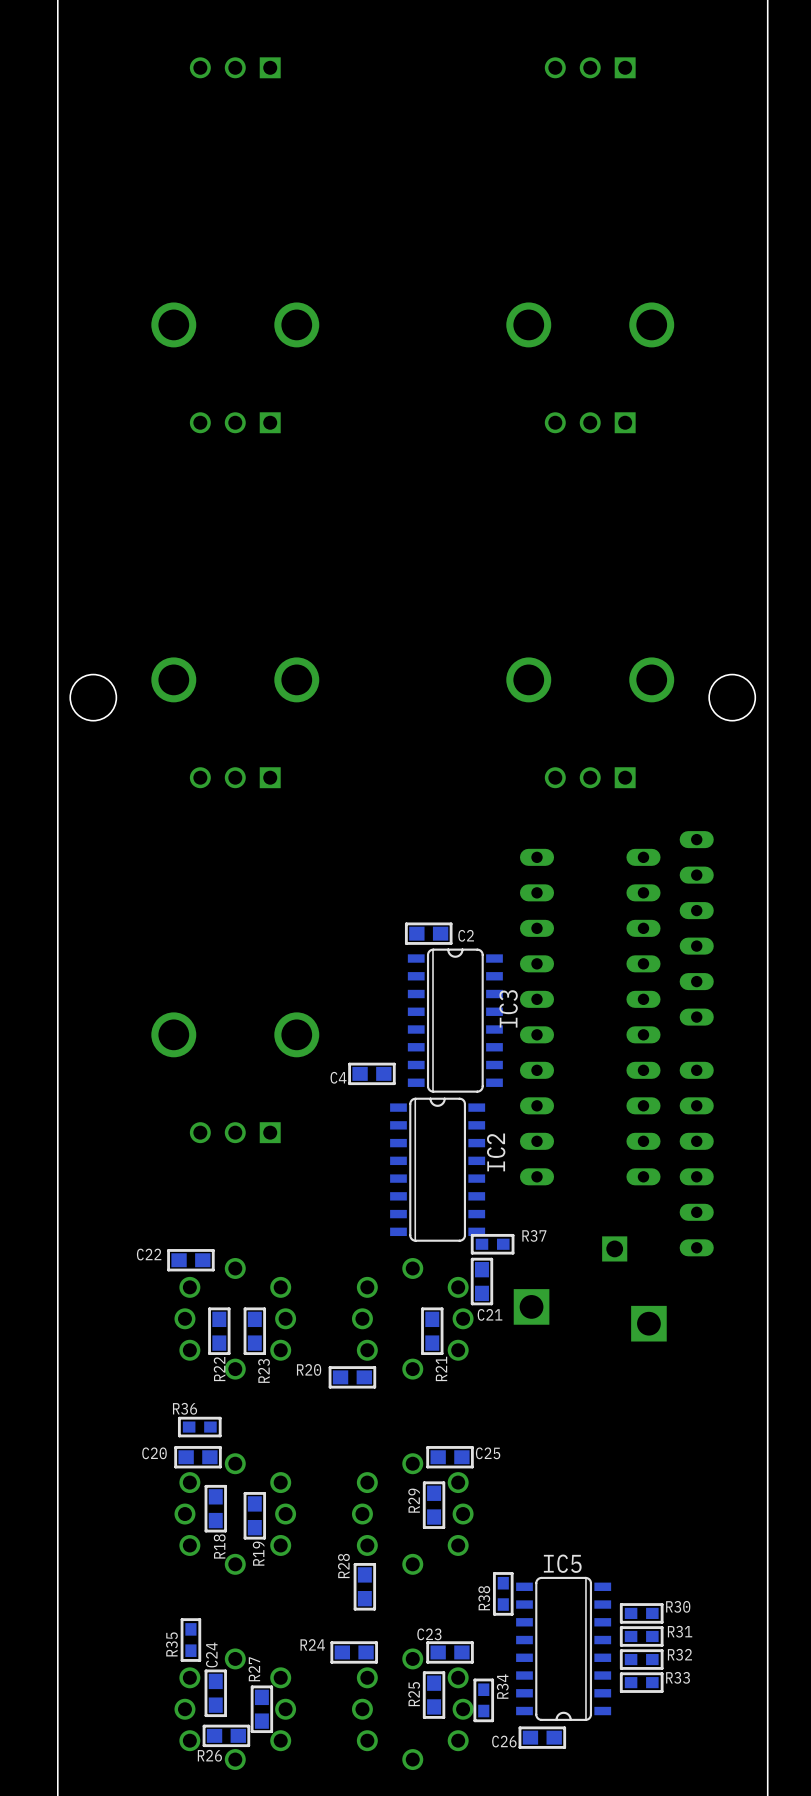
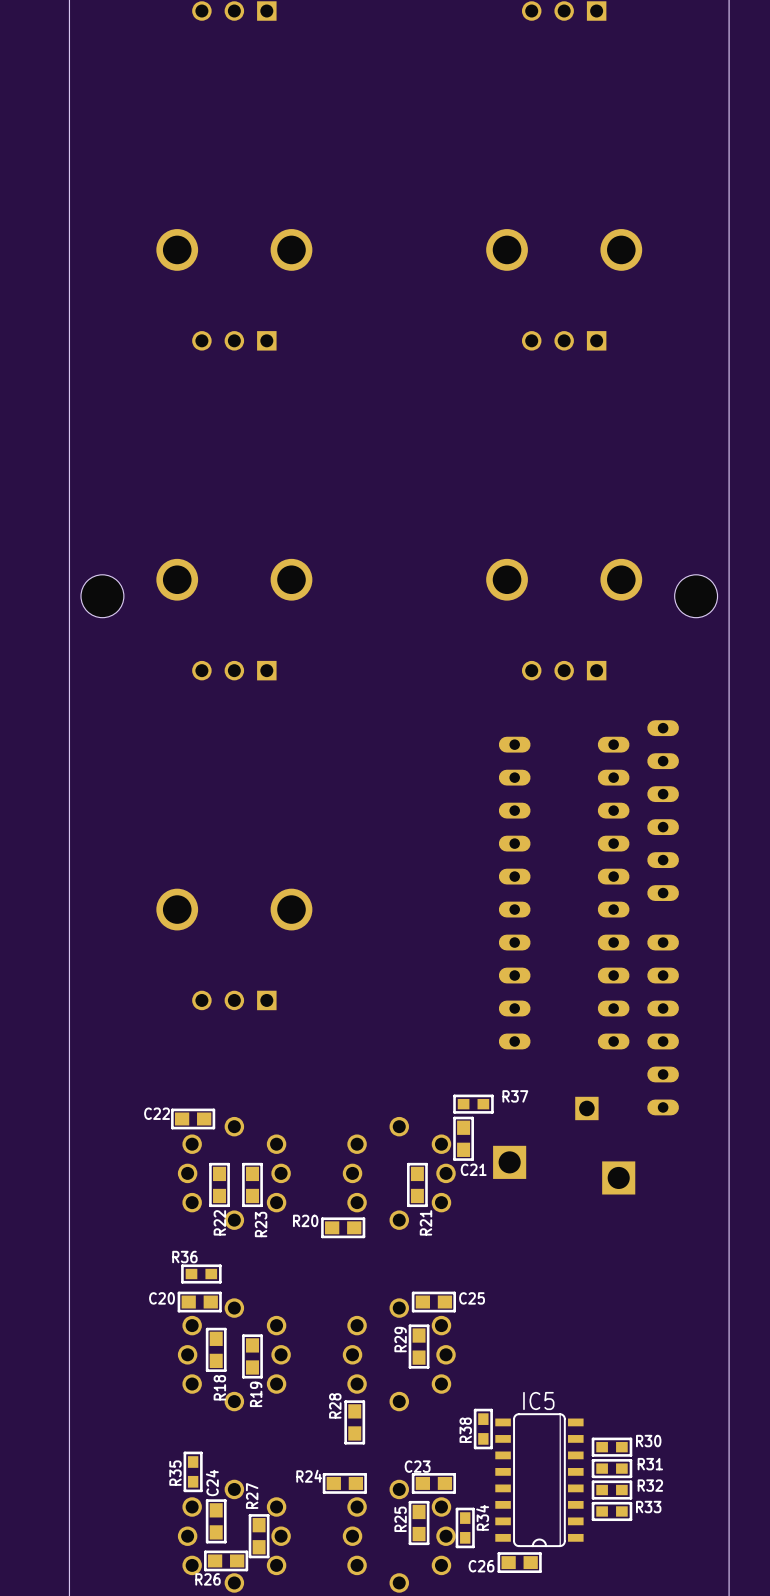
C2: (428, 933) -> none
IC3: (455, 1020) -> none
C4: (371, 1073) -> none
IC2: (437, 1169) -> none

